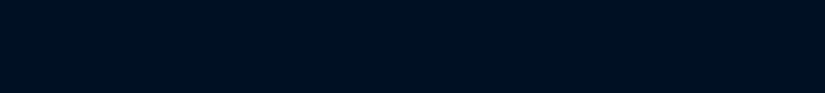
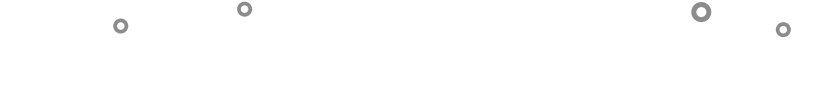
via: none -> (244, 9)
via: none -> (701, 12)
via: none -> (120, 26)
via: none -> (783, 29)

